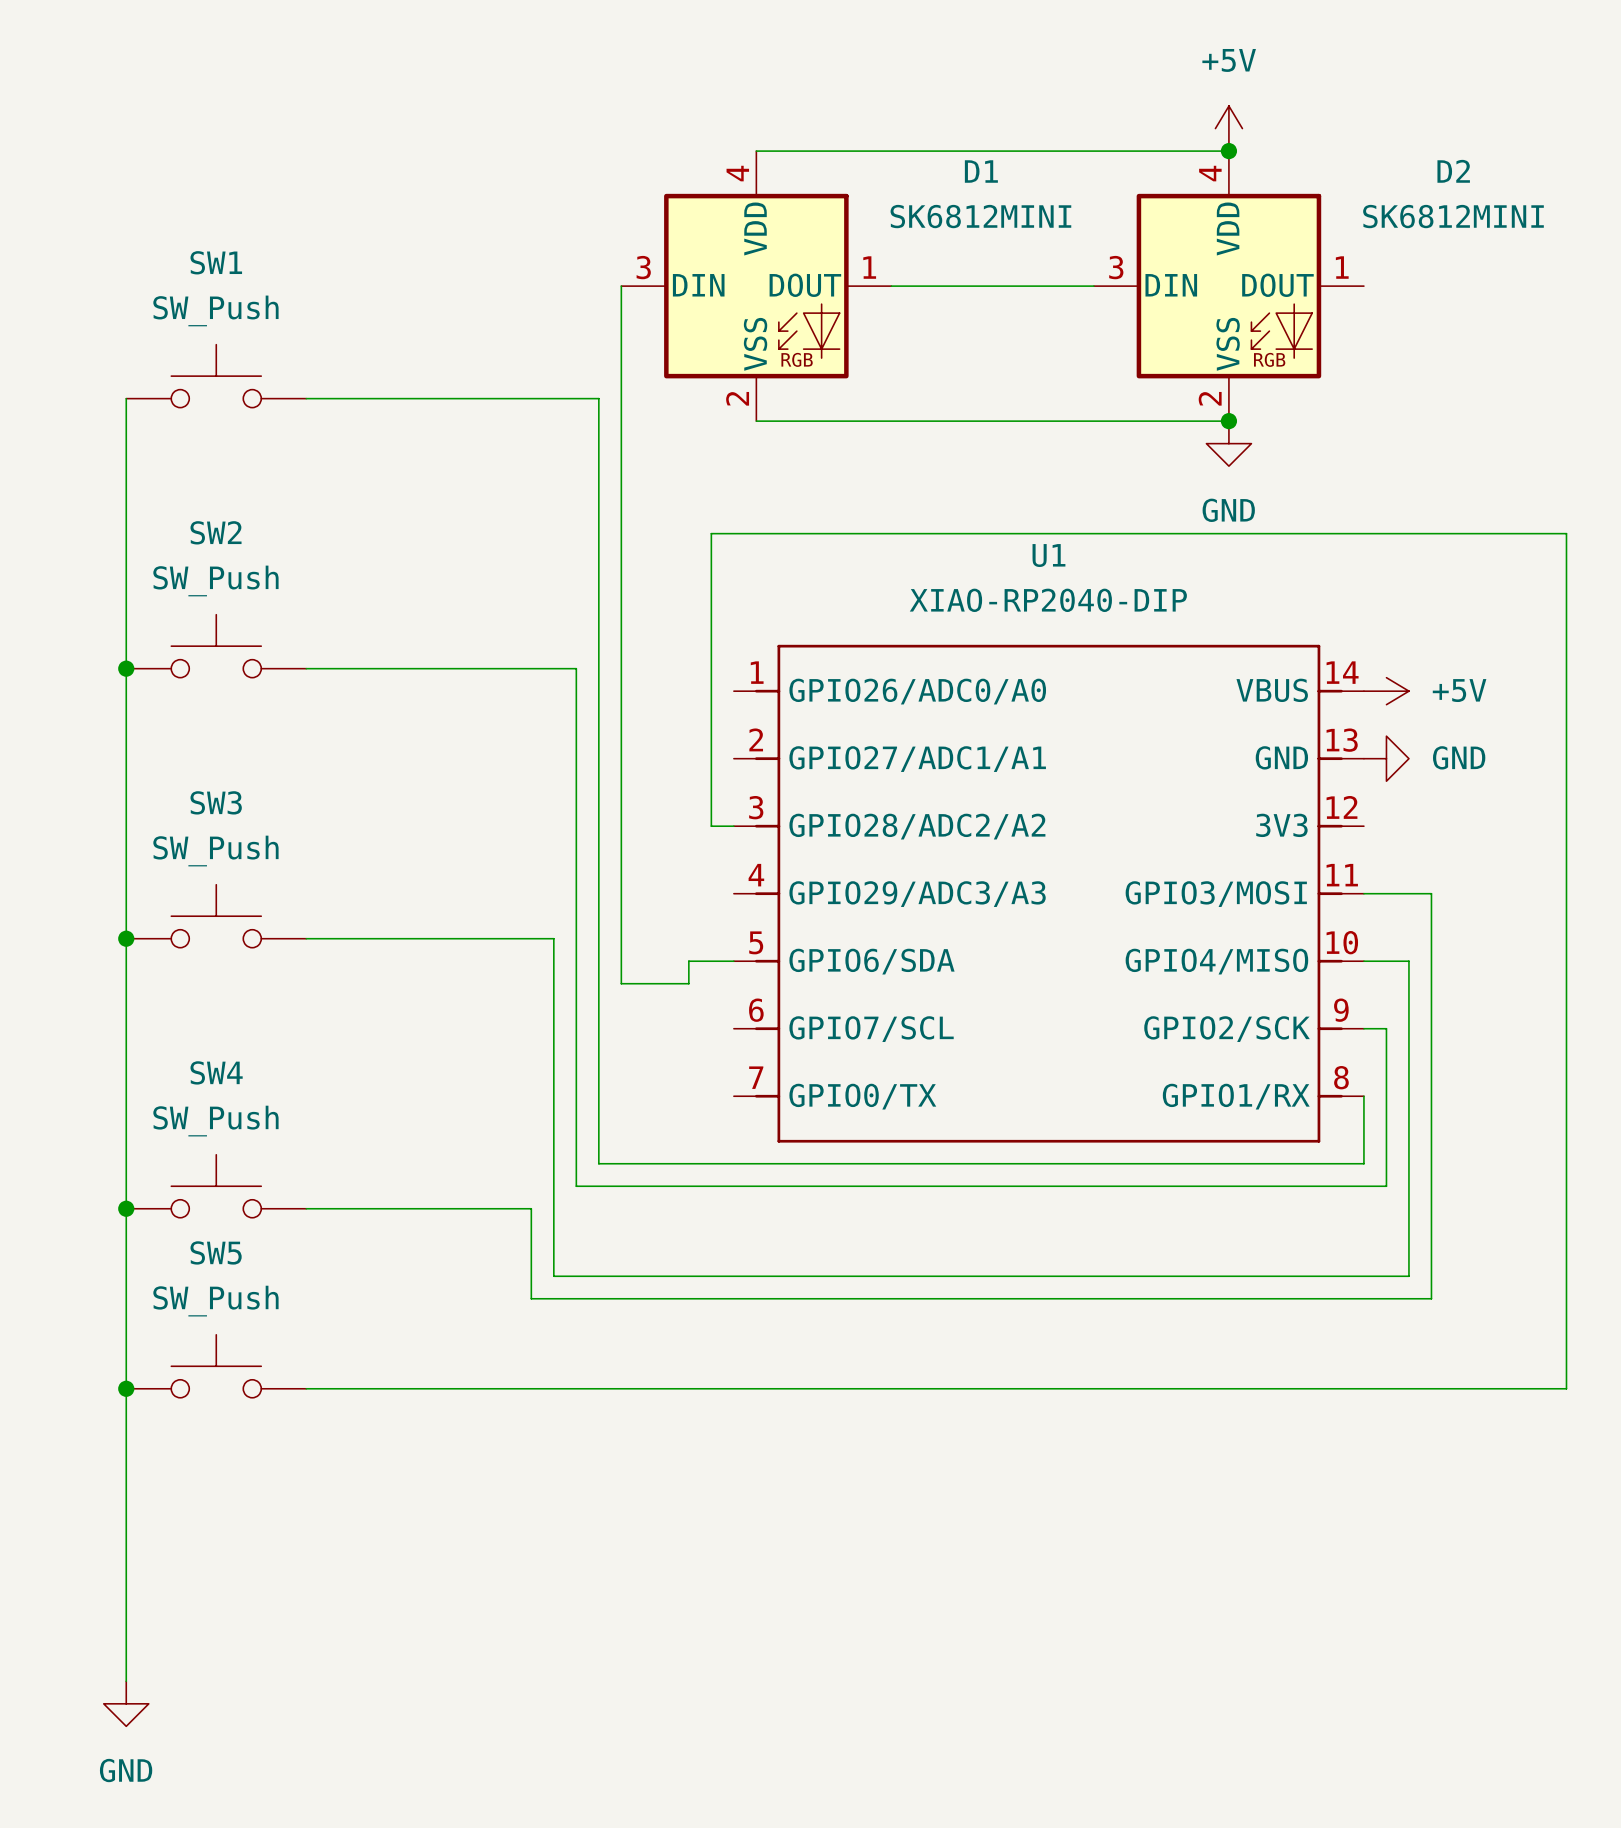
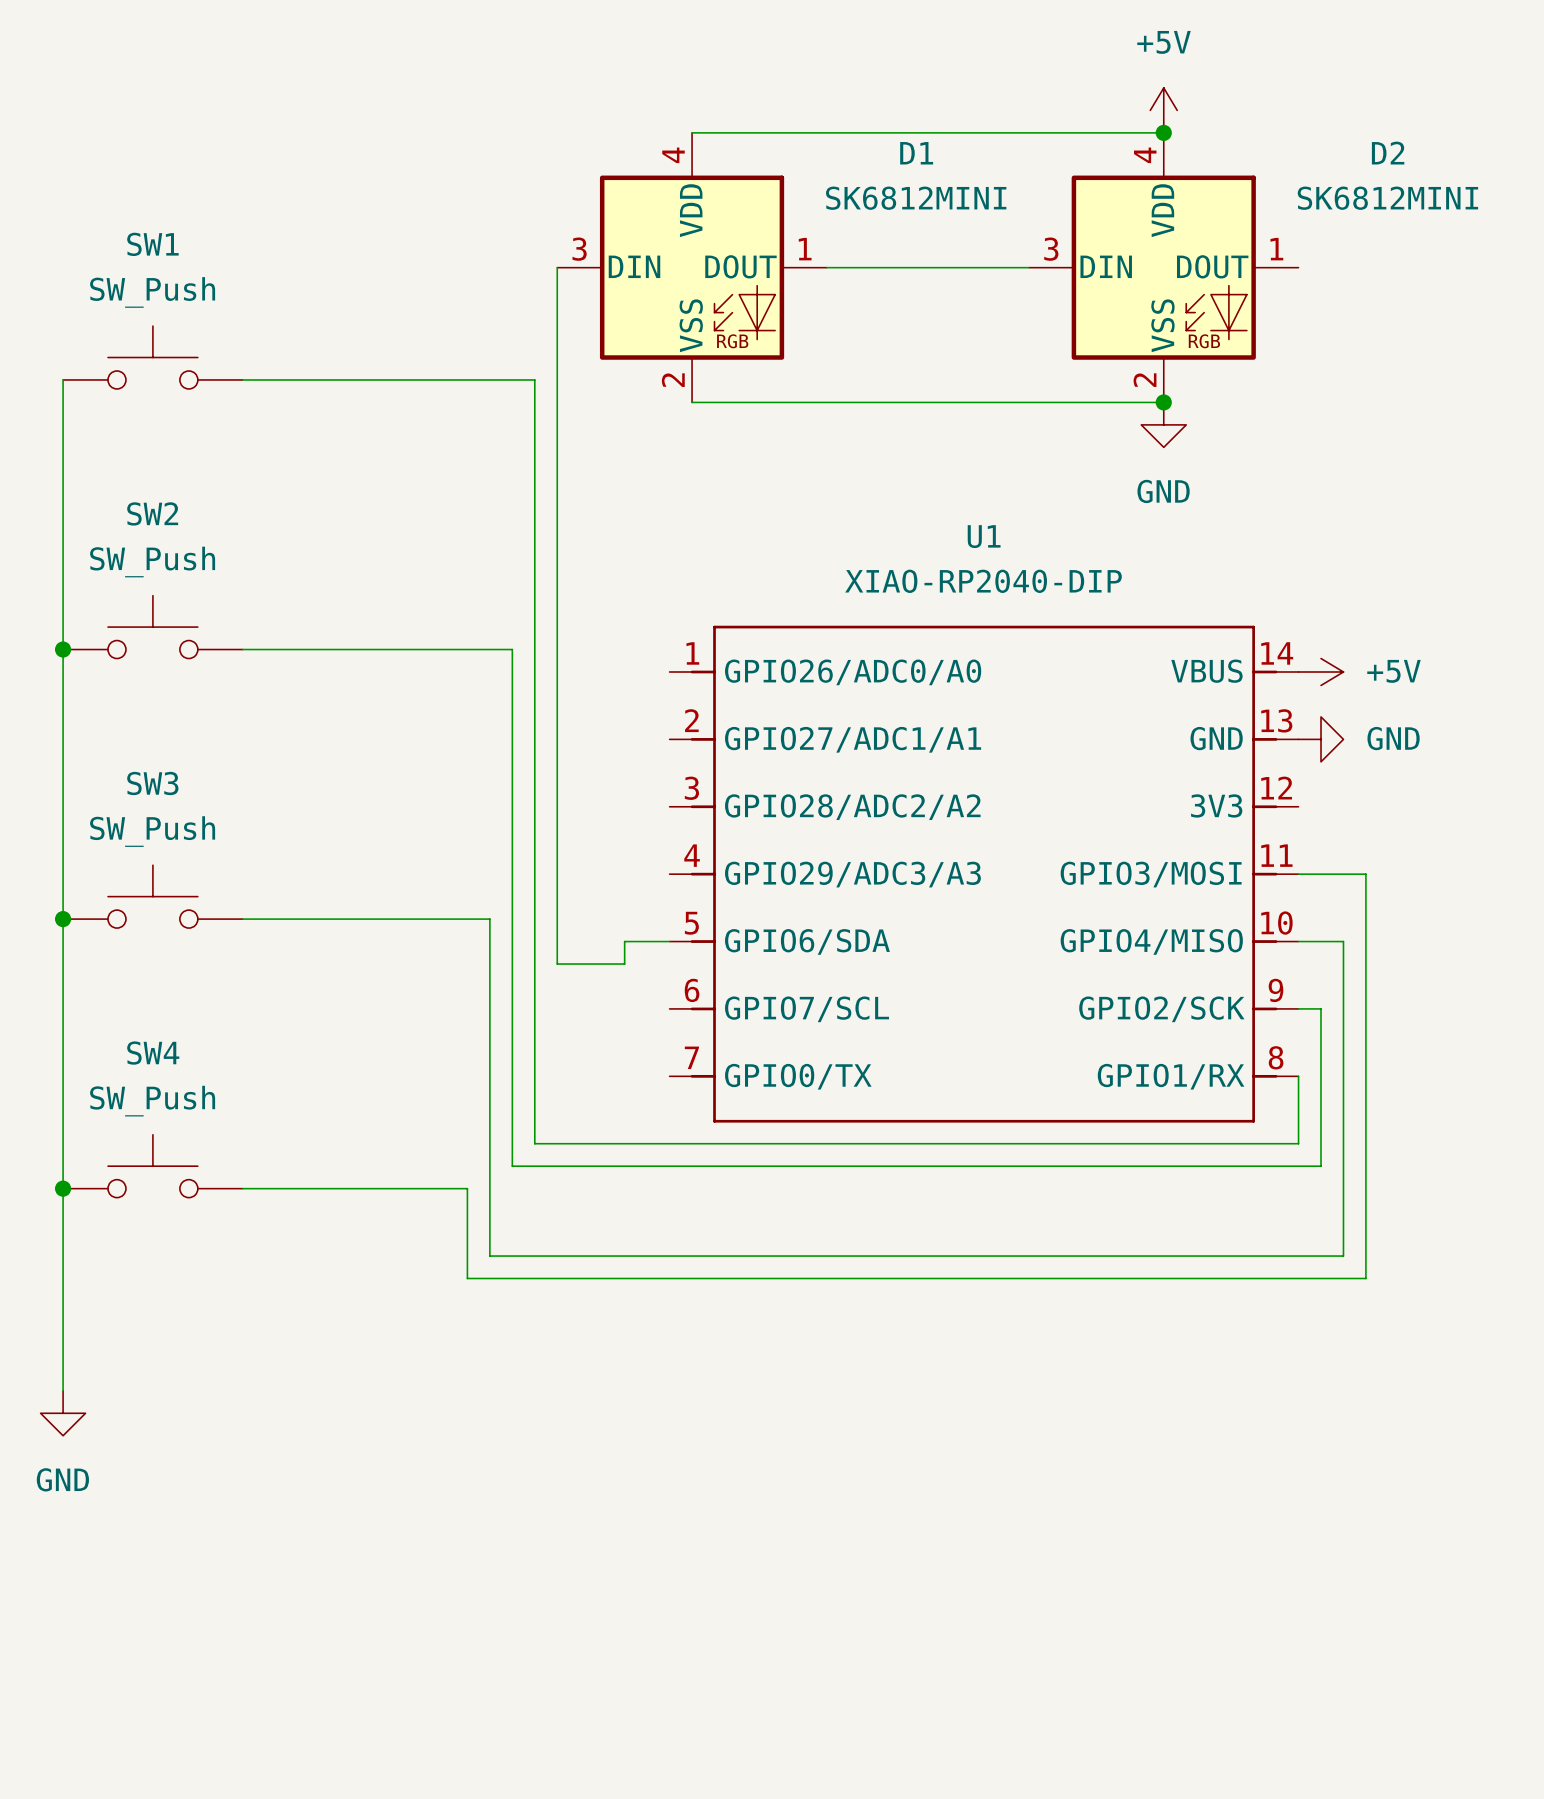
wire: (733, 826) (711, 826) (711, 533) (1566, 533) (1566, 1388) (306, 1388) -> none
SW5: SW_Push (216, 1366) -> none
junction: (126, 1388) -> none
wire: (126, 1411) (126, 1681) -> none
power symbol position: GND (126, 1703) -> GND (63, 1413)

